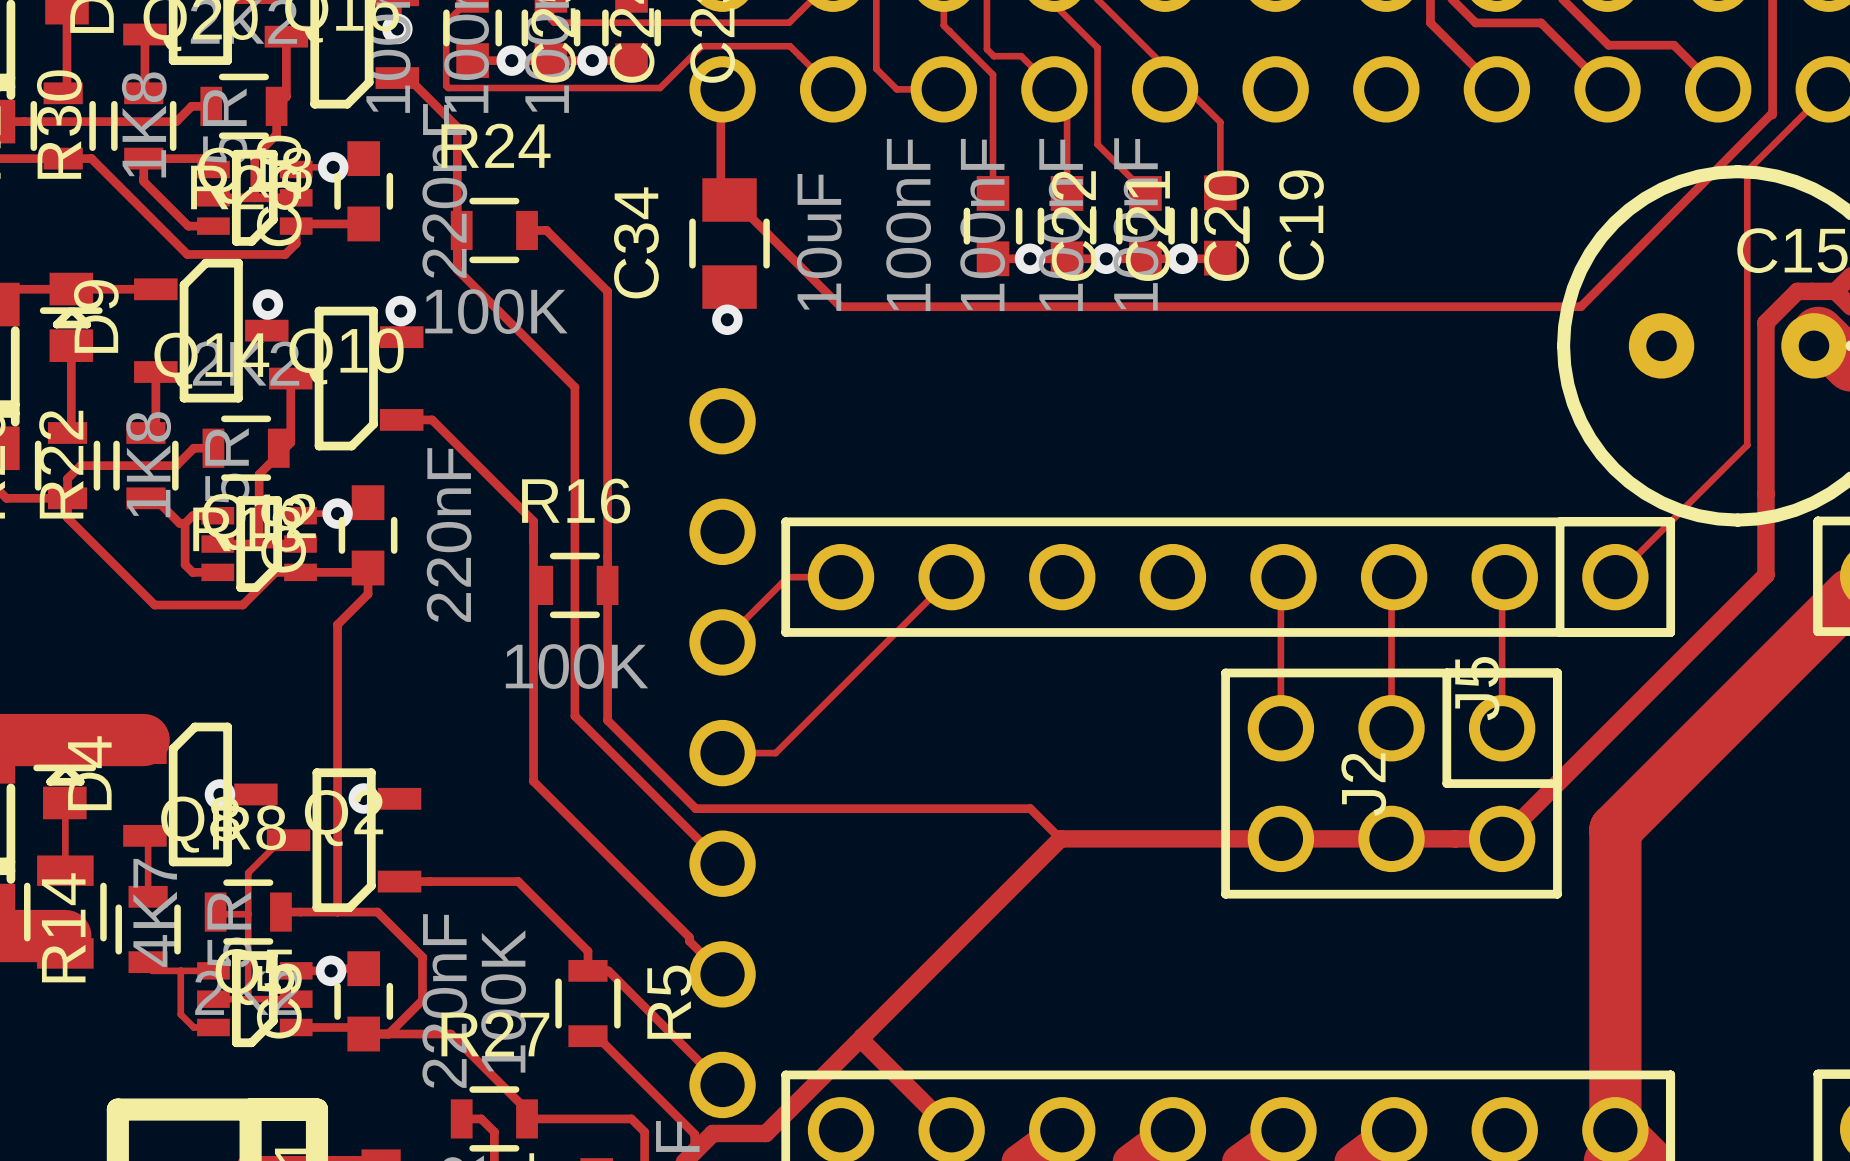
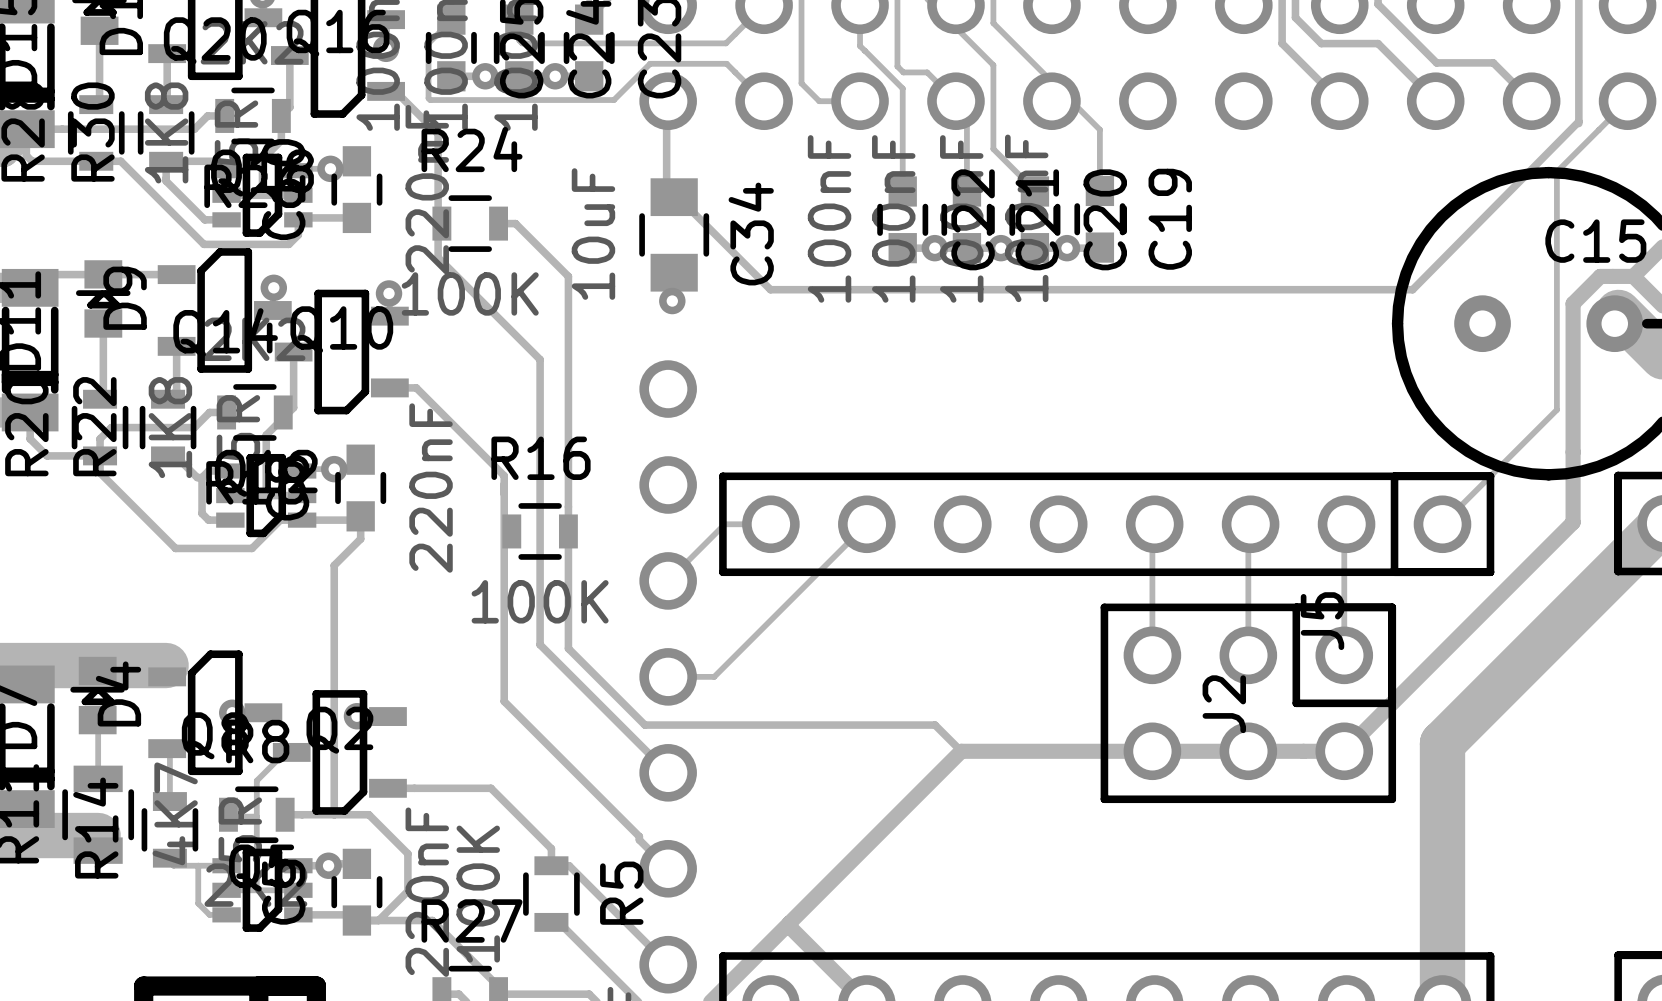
C34 name position: C34 (636, 242) -> C34 (751, 234)
C34 value position: 10uF (819, 242) -> 10uF (593, 234)

